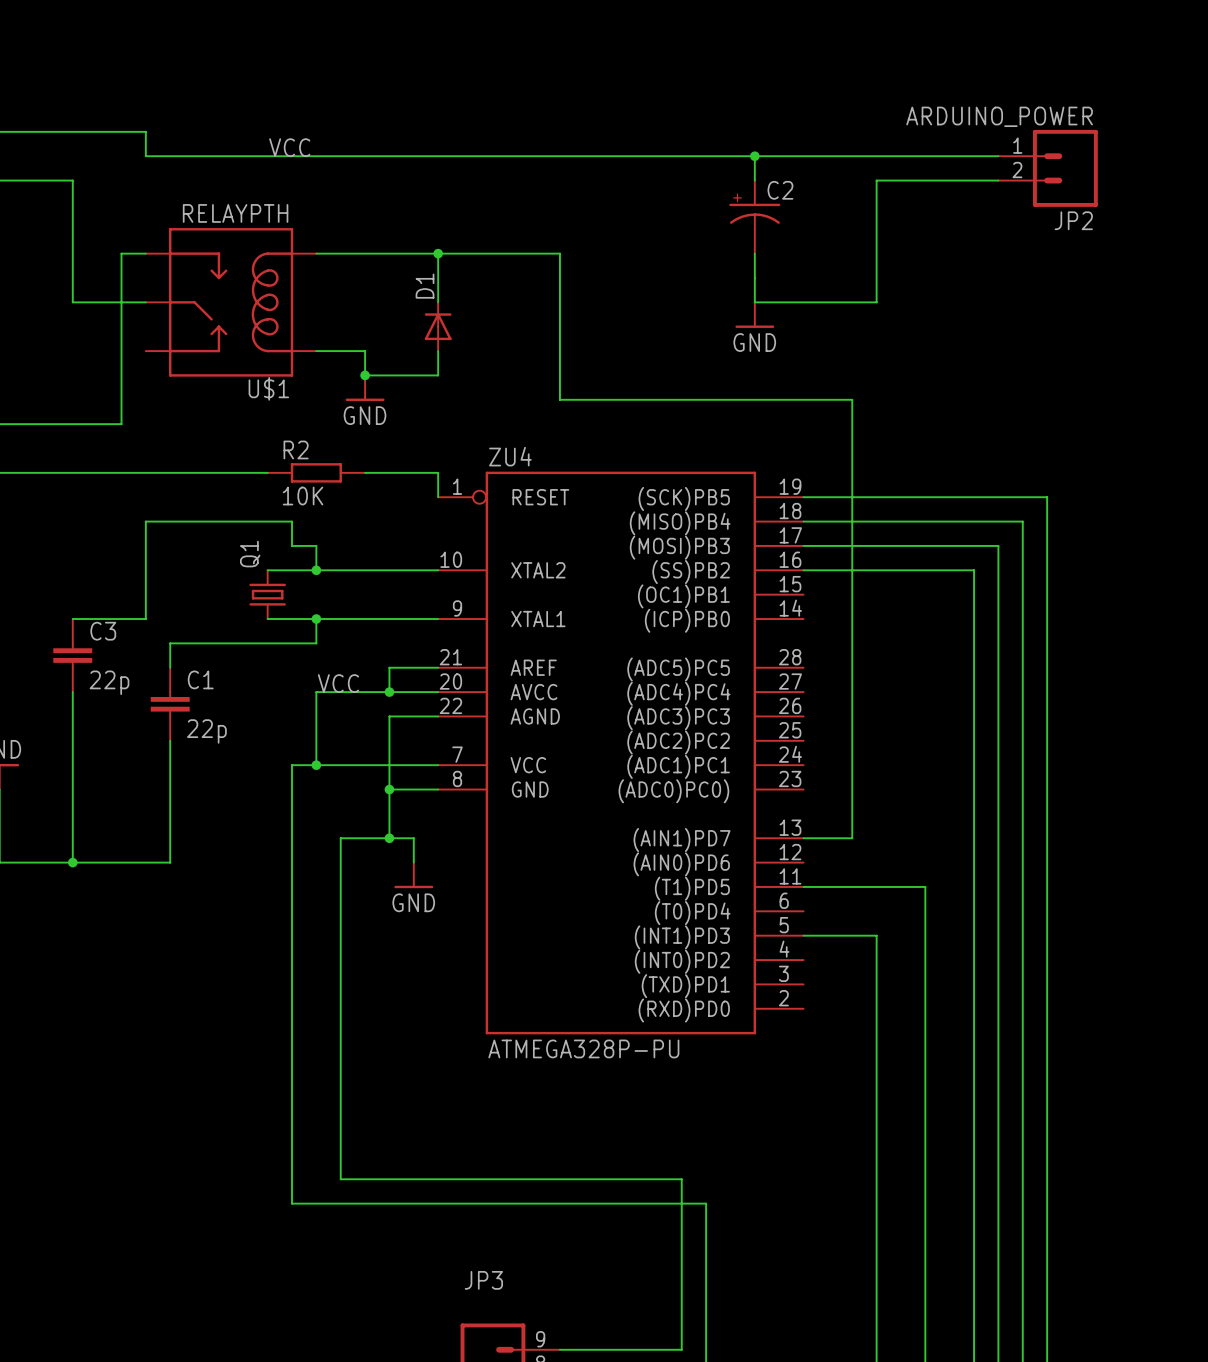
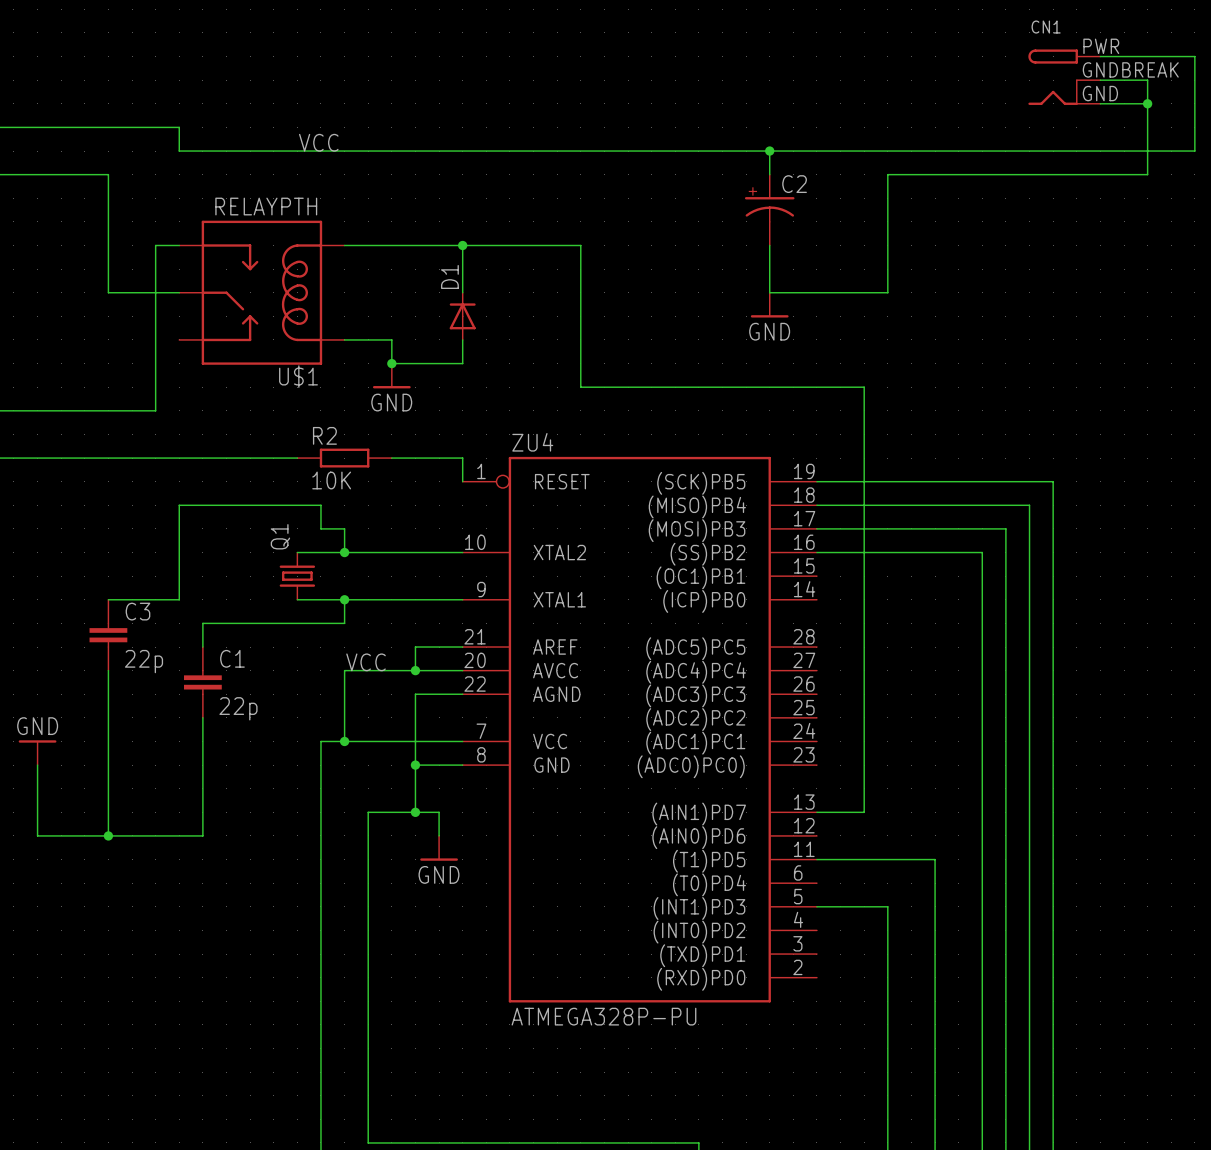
wire: none -> (1100, 56) (1194, 56) (1194, 151) (1005, 151)
CN1: none -> (1064, 77)
wire: none -> (1100, 80) (1147, 80) (1147, 174) (1005, 174)
wire: none -> (1100, 103) (1147, 103)
junction: none -> (1147, 103)
JP2: ARDUINO_POWER (1048, 168) -> none

